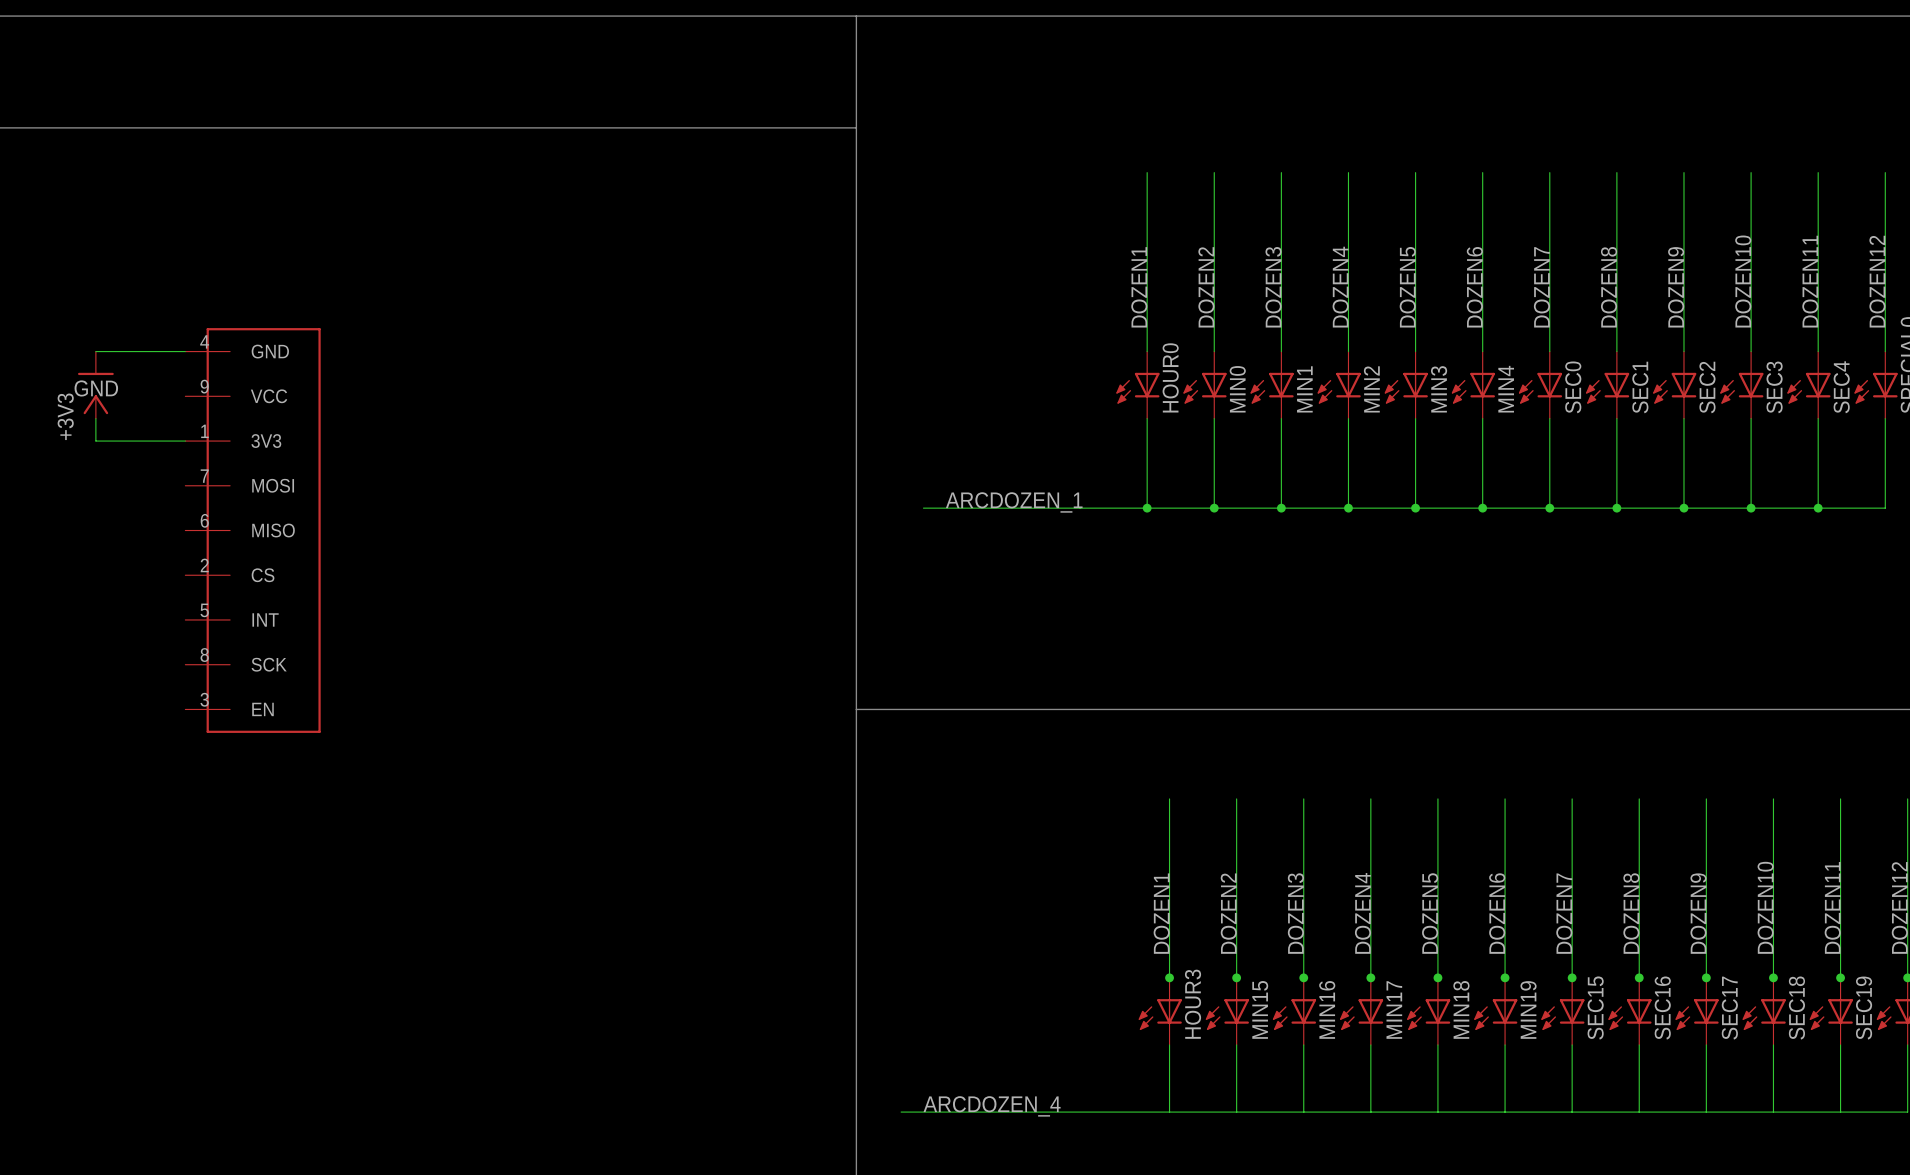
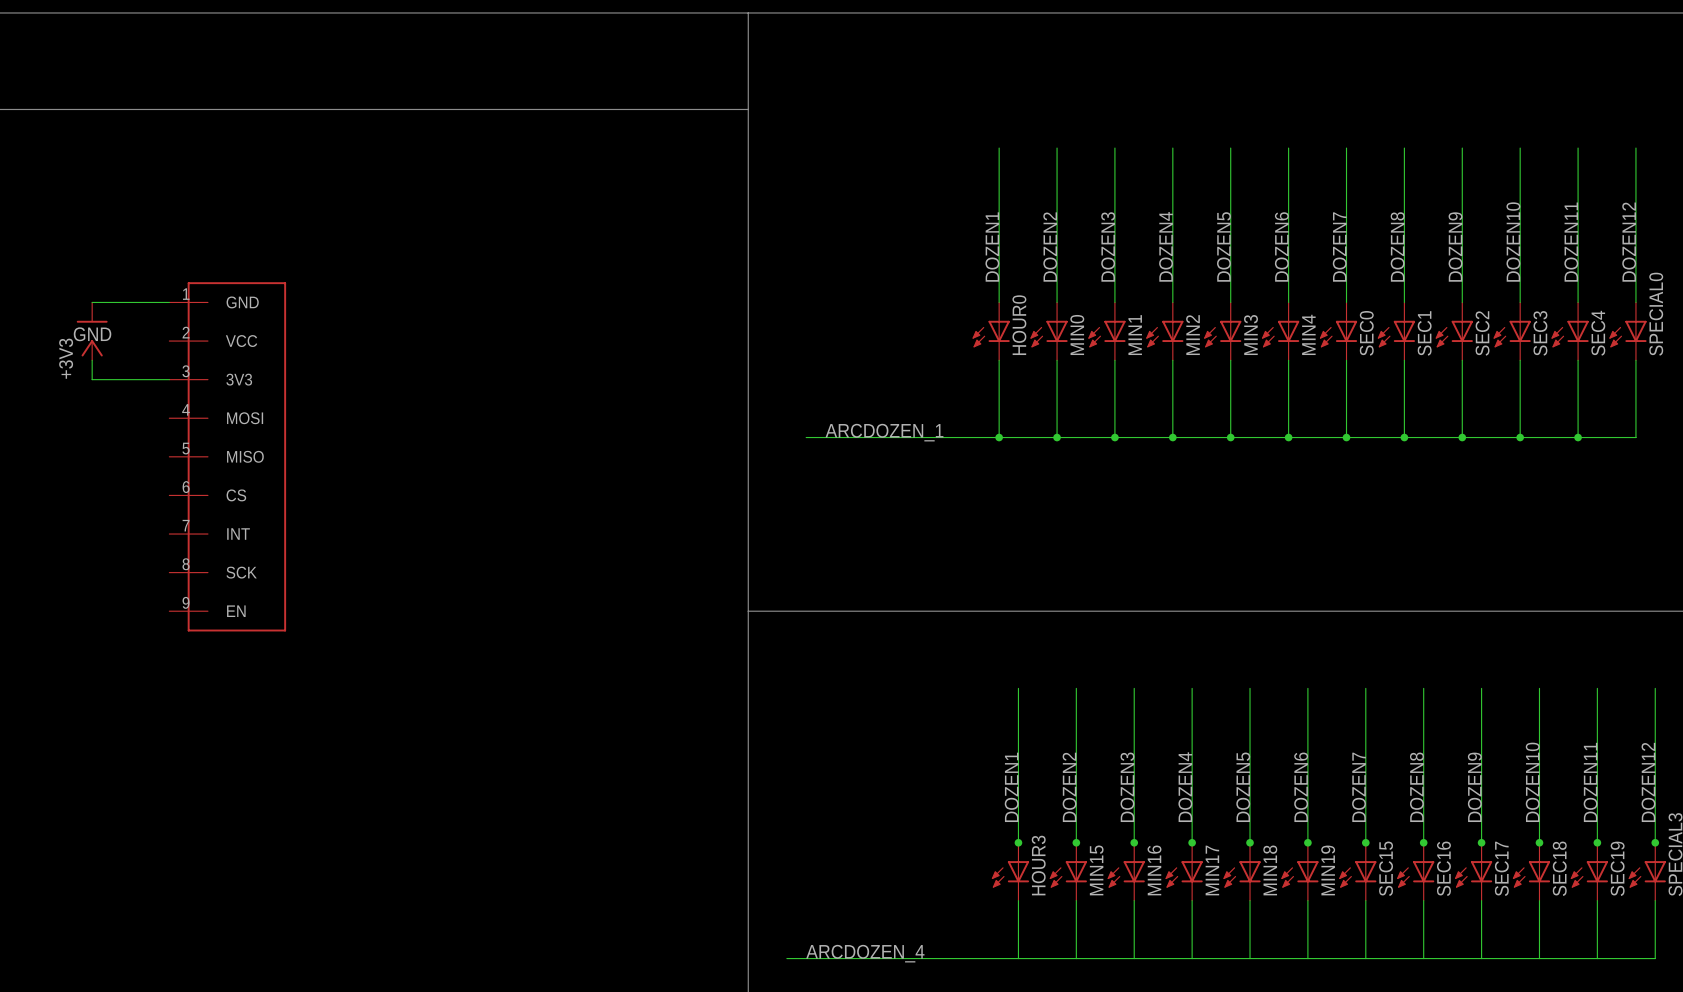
part pin number: 4 (204, 341) -> 1 (186, 294)
part pin number: 9 (204, 386) -> 2 (186, 332)
part pin number: 1 (204, 431) -> 3 (186, 371)
part pin number: 7 (204, 476) -> 4 (185, 409)
part pin number: 6 (204, 520) -> 5 (186, 448)
part pin number: 2 (204, 565) -> 6 (186, 487)
part pin number: 5 (204, 610) -> 7 (186, 525)
part pin number: 3 (204, 699) -> 9 (186, 602)

